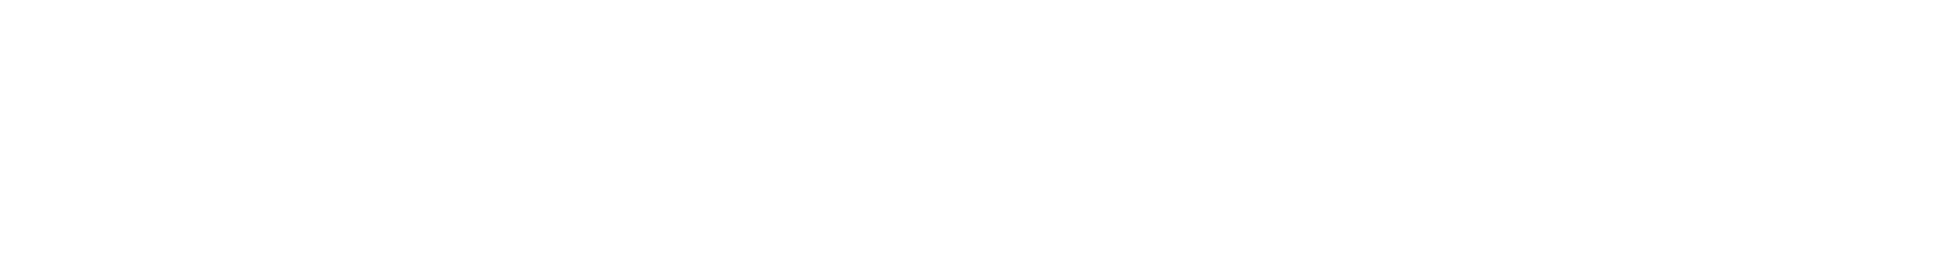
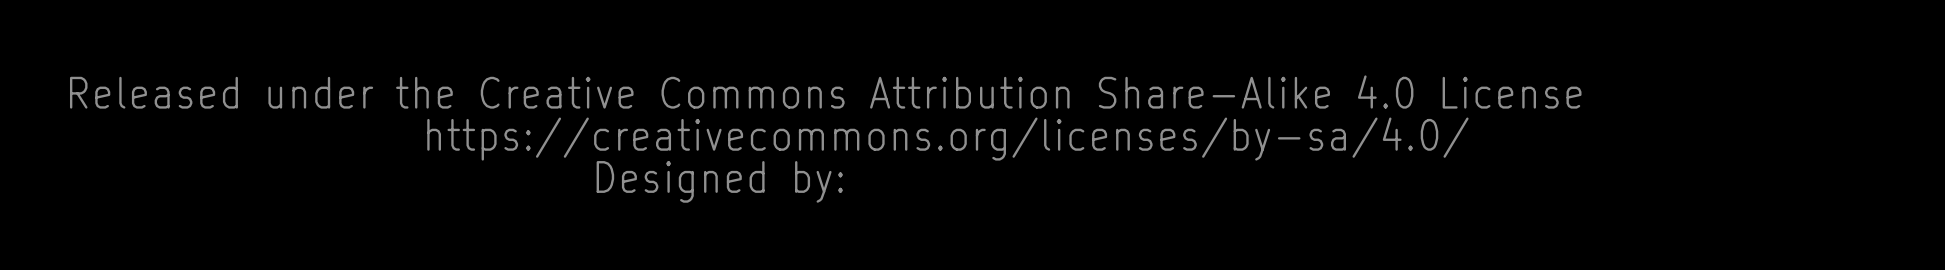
drawing: none -> [69, 75, 1582, 203]

